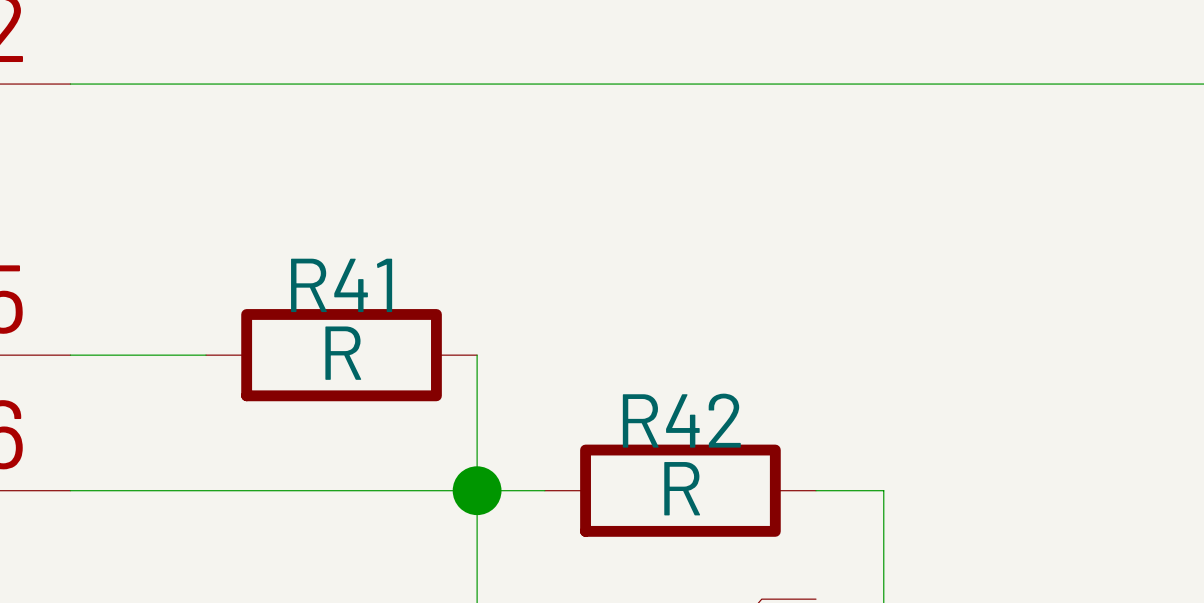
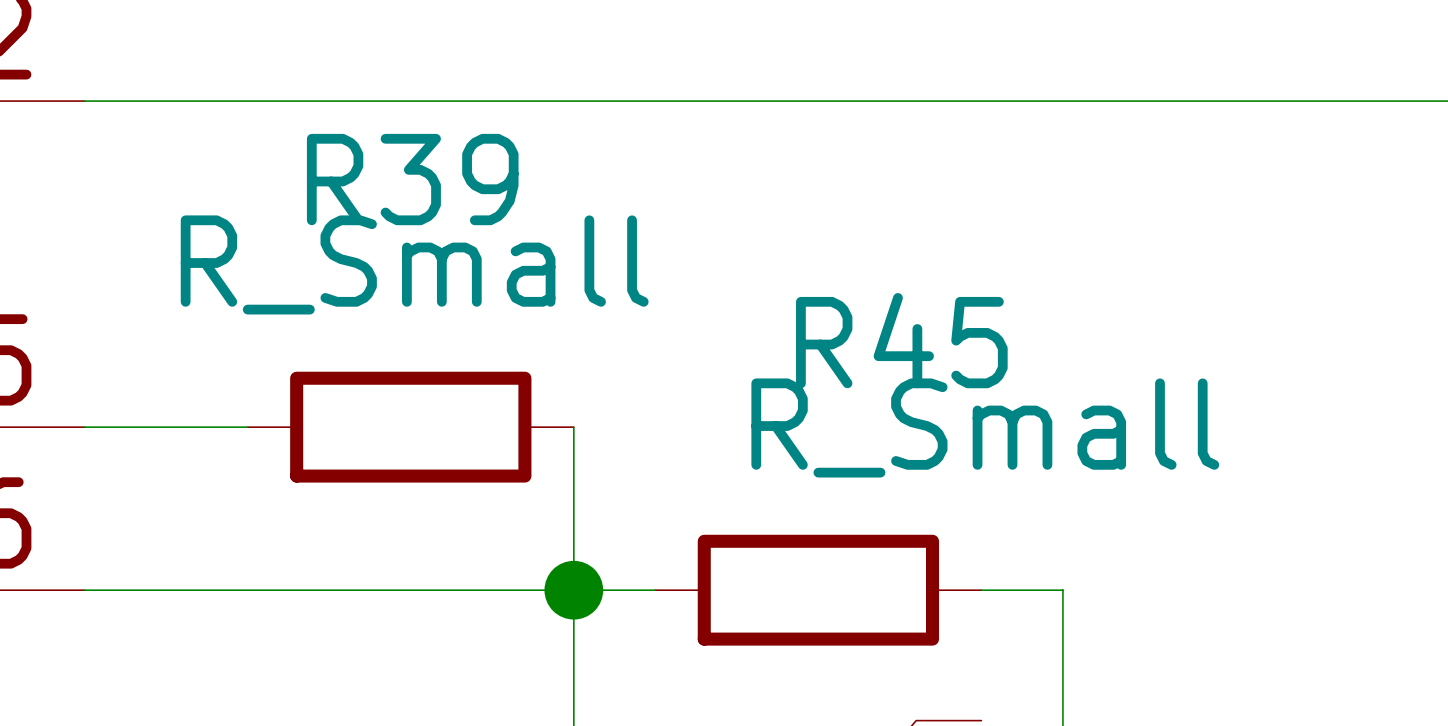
R41 name: R41 (341, 285) -> R39 (412, 179)
R41 value: R (343, 353) -> R_Small (414, 264)
R42 name: R42 (681, 420) -> R45 (901, 340)
R42 value: R (682, 488) -> R_Small (985, 427)

